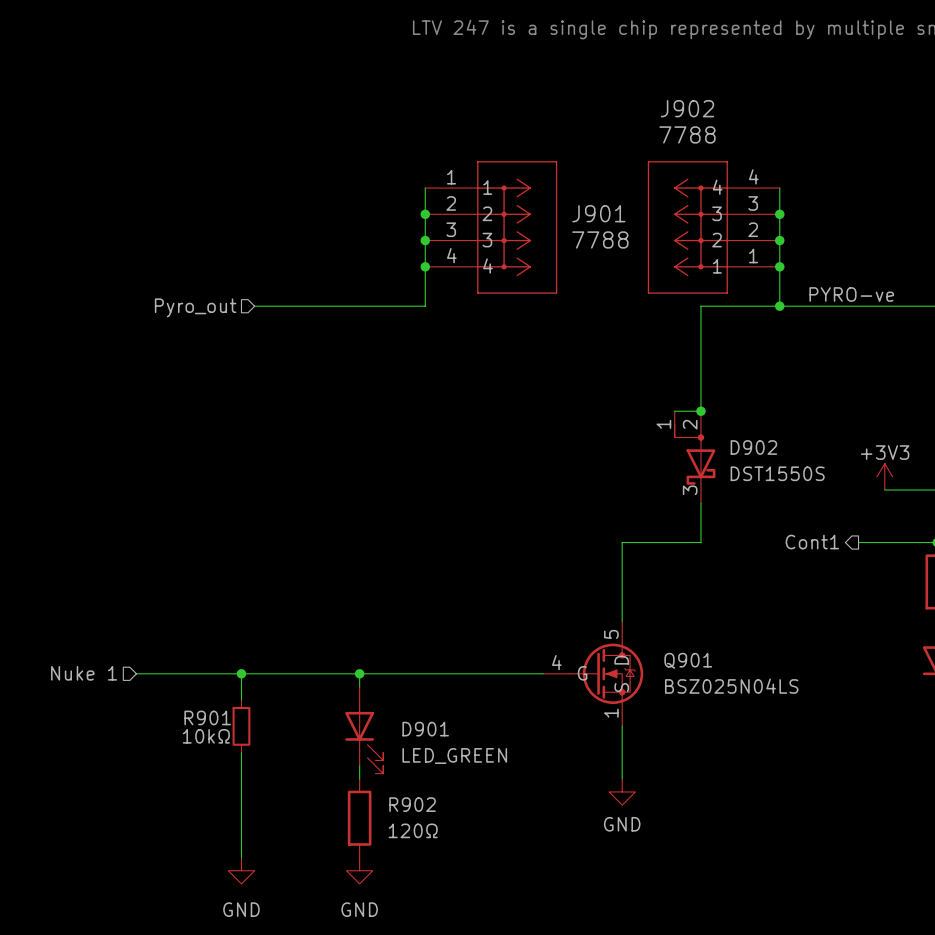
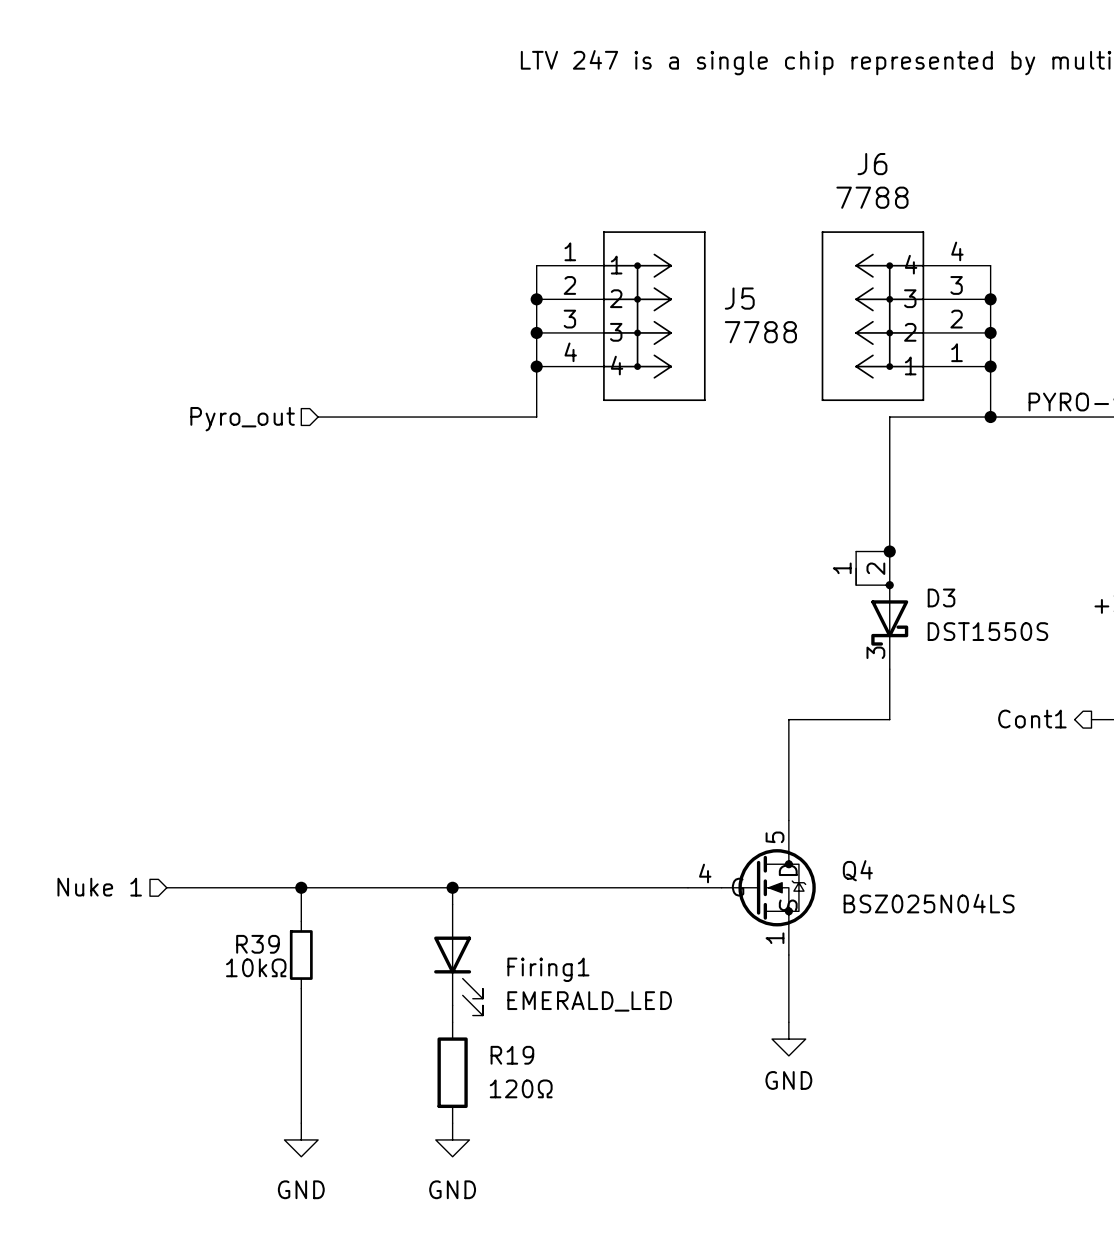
J902 name: J902 (687, 108) -> J6 (872, 164)
J901 name: J901 (598, 213) -> J5 (739, 298)
D902 name: D902 (753, 447) -> D3 (941, 597)
Q901 name: Q901 (688, 660) -> Q4 (857, 870)
R901 name: R901 (207, 717) -> R39 (257, 944)
D901 name: D901 (425, 729) -> Firing1 (548, 969)
D901 value: LED_GREEN (454, 756) -> EMERALD_LED (589, 1001)
R902 name: R902 (412, 804) -> R19 (512, 1055)

